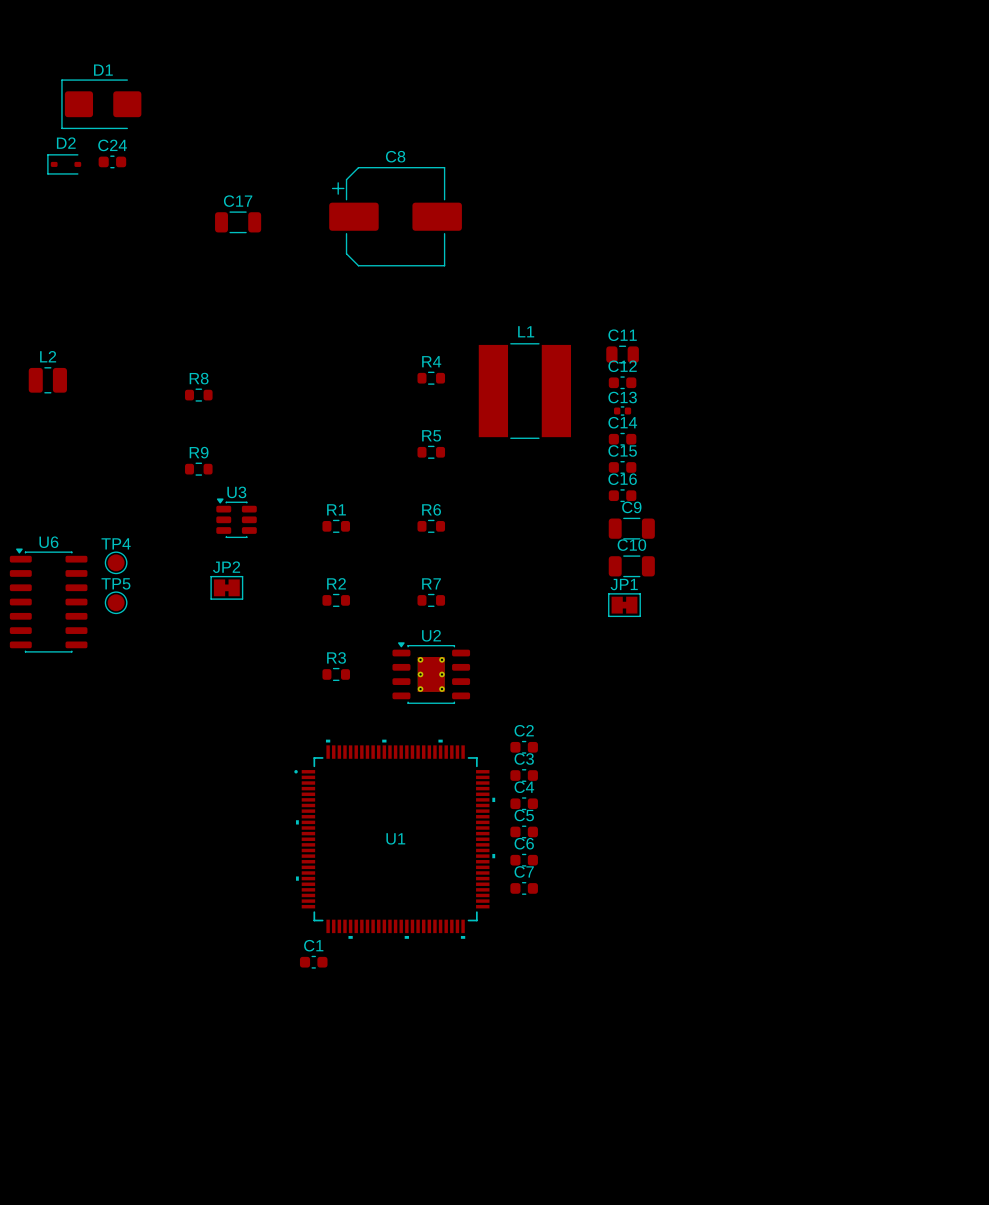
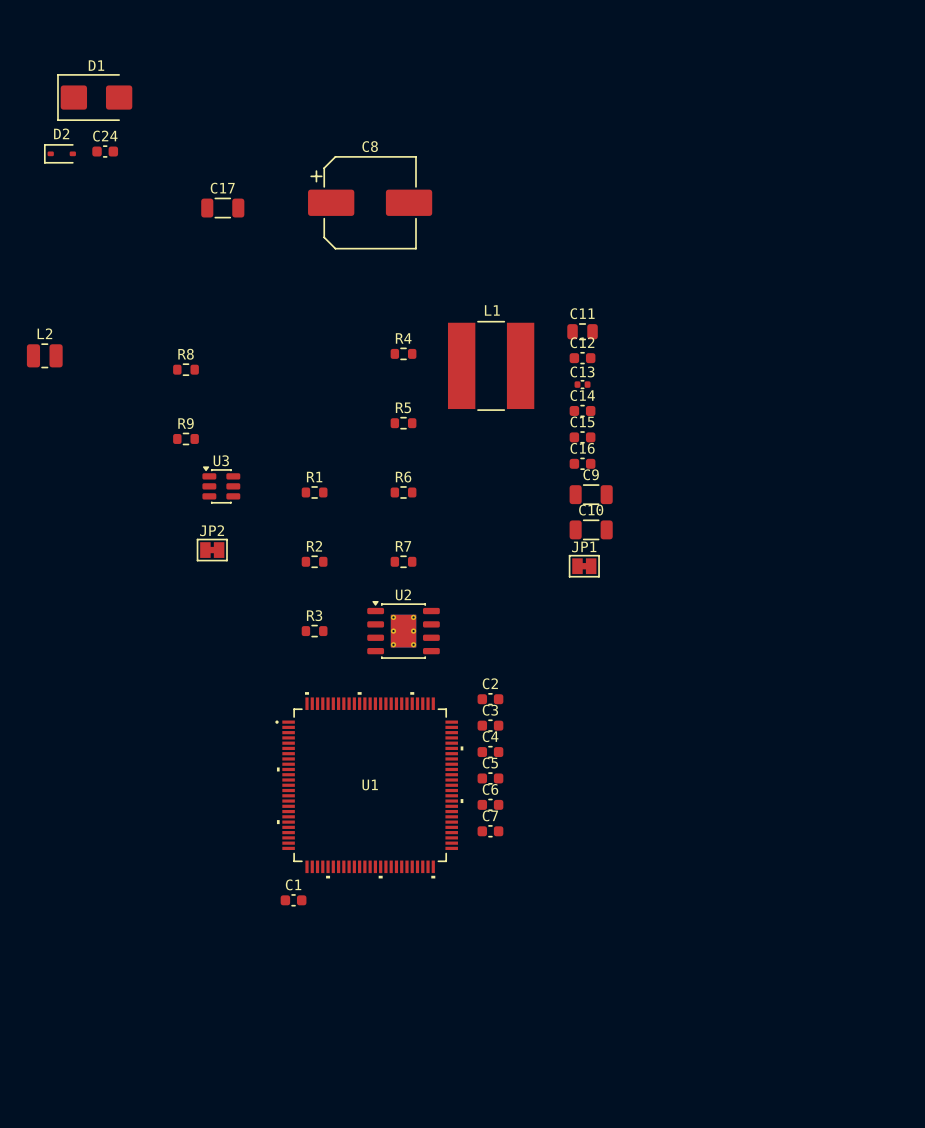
TP4: (116, 562) -> none
U6: (48, 600) -> none
TP5: (116, 602) -> none

